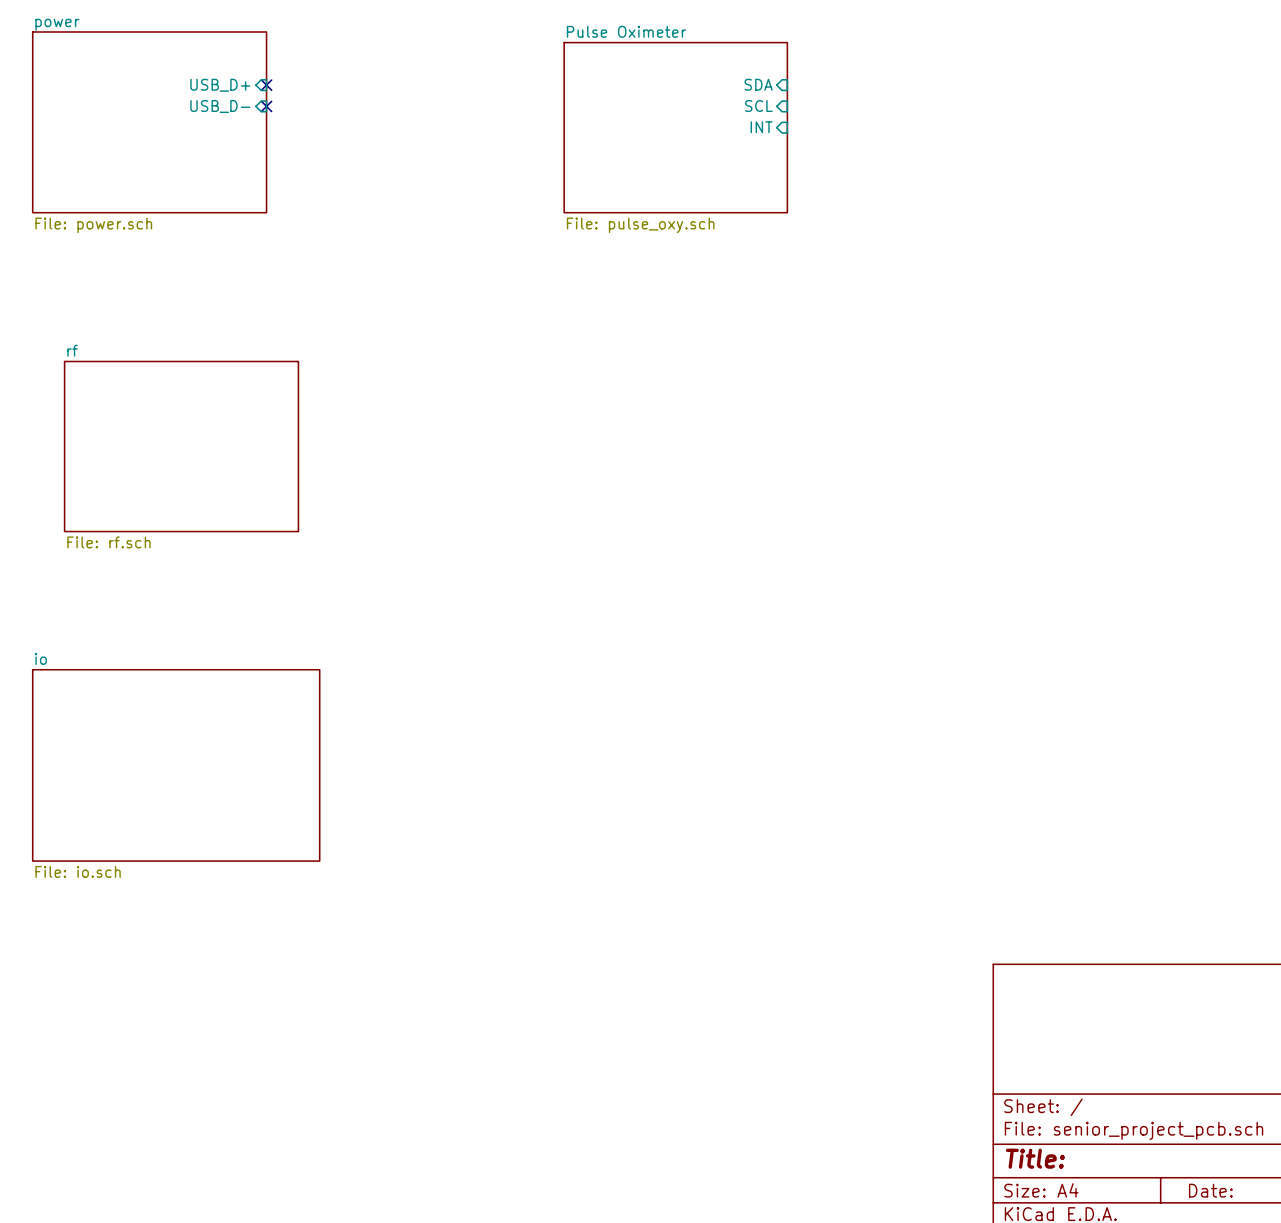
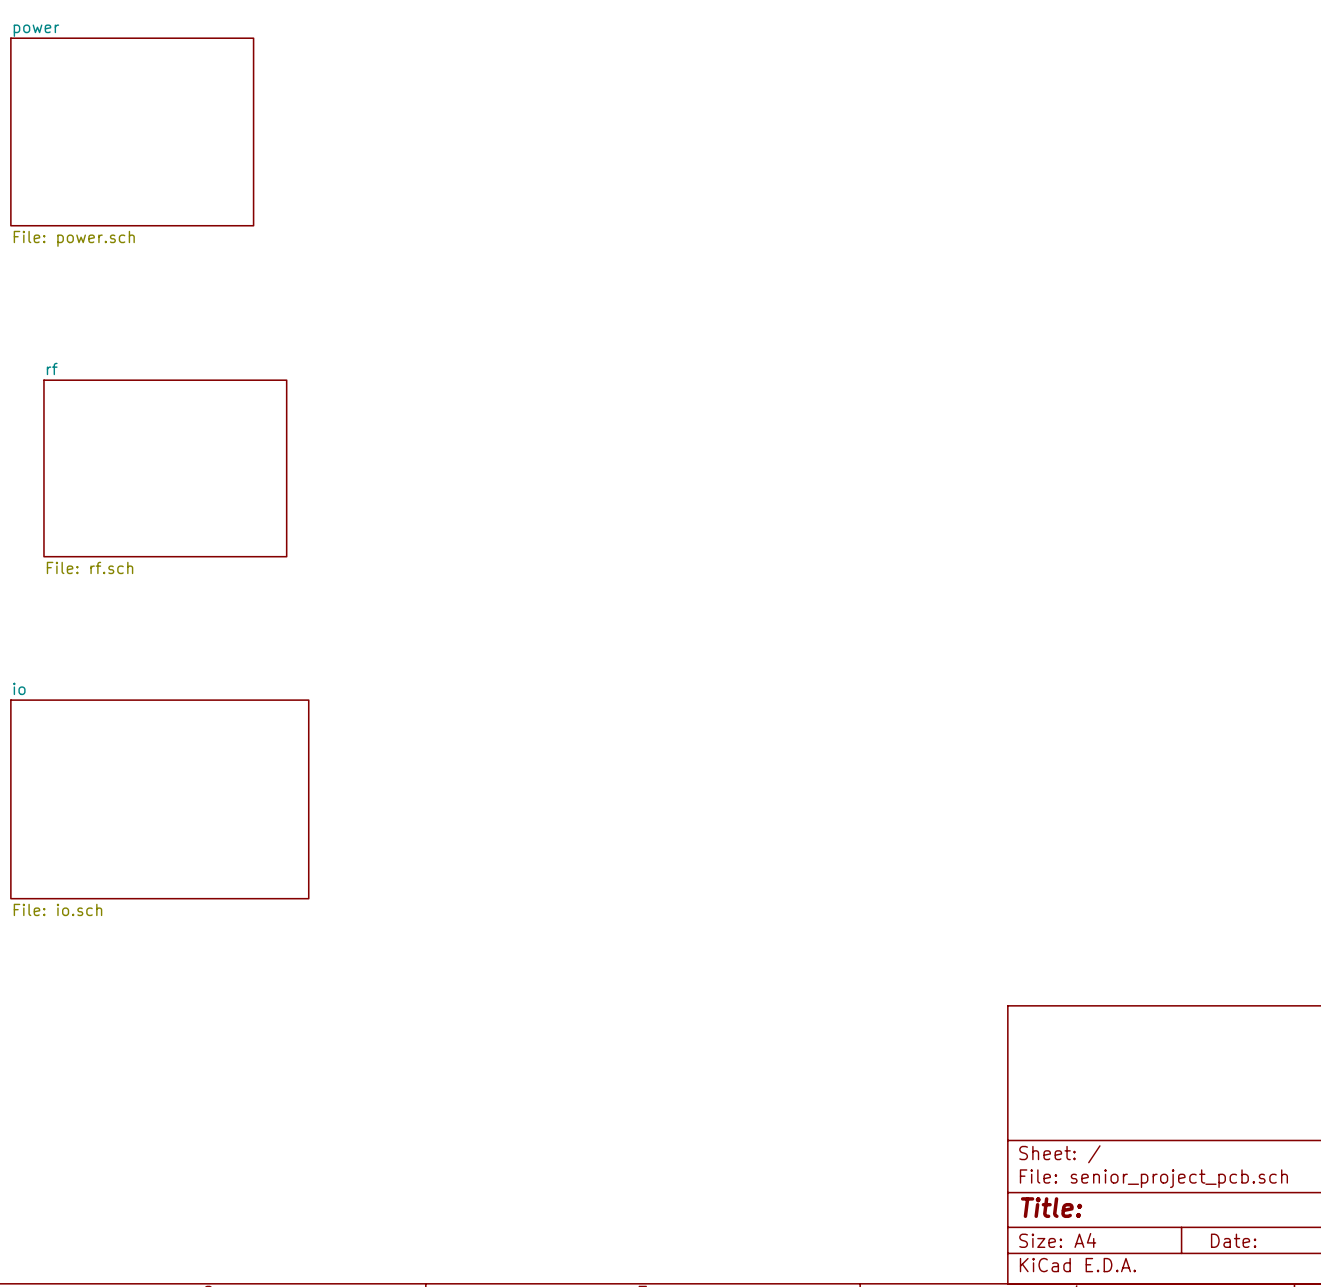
sheet pin: SDA (758, 84) -> none
sheet pin: USB_D+ (220, 85) -> none
no-connect mark: (266, 85) -> none
sheet pin: USB_D- (220, 106) -> none
no-connect mark: (266, 106) -> none
sheet pin: SCL (758, 106) -> none
sheet Pulse Oximeter: File: pulse_oxy.sch (675, 127) -> none
sheet pin: INT (761, 127) -> none

